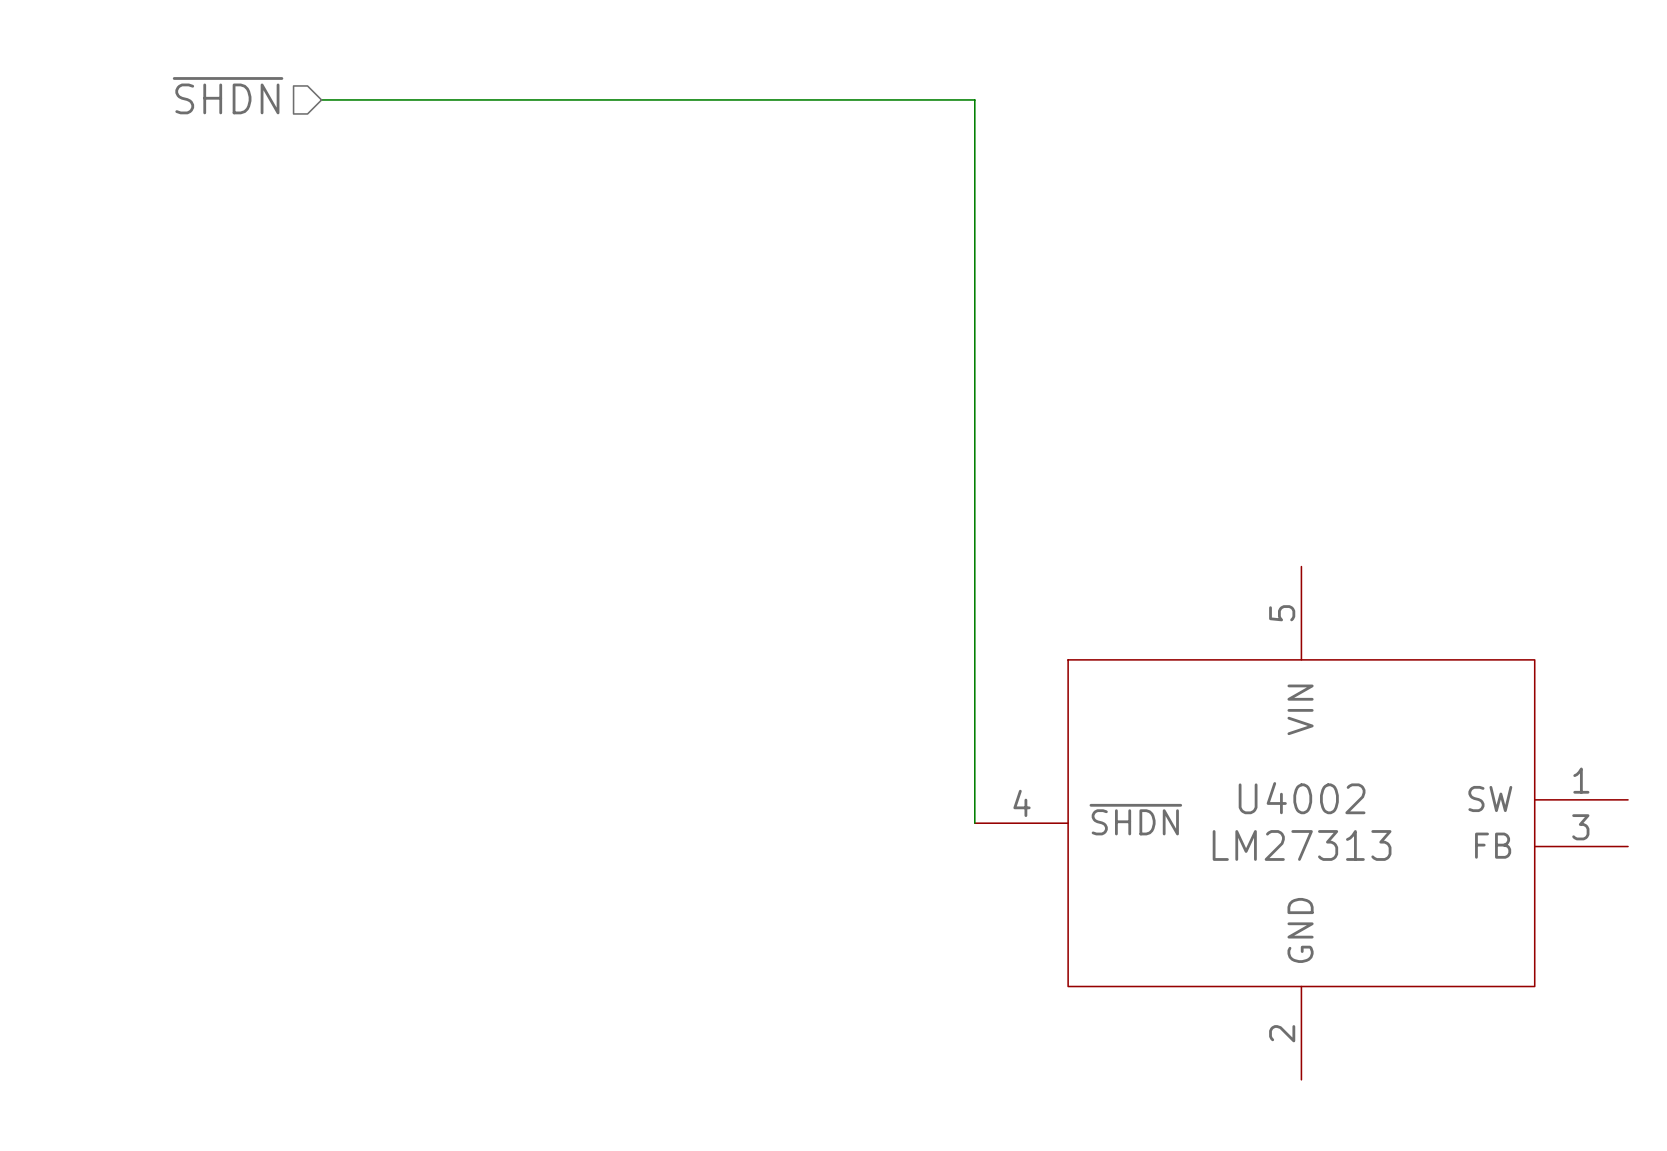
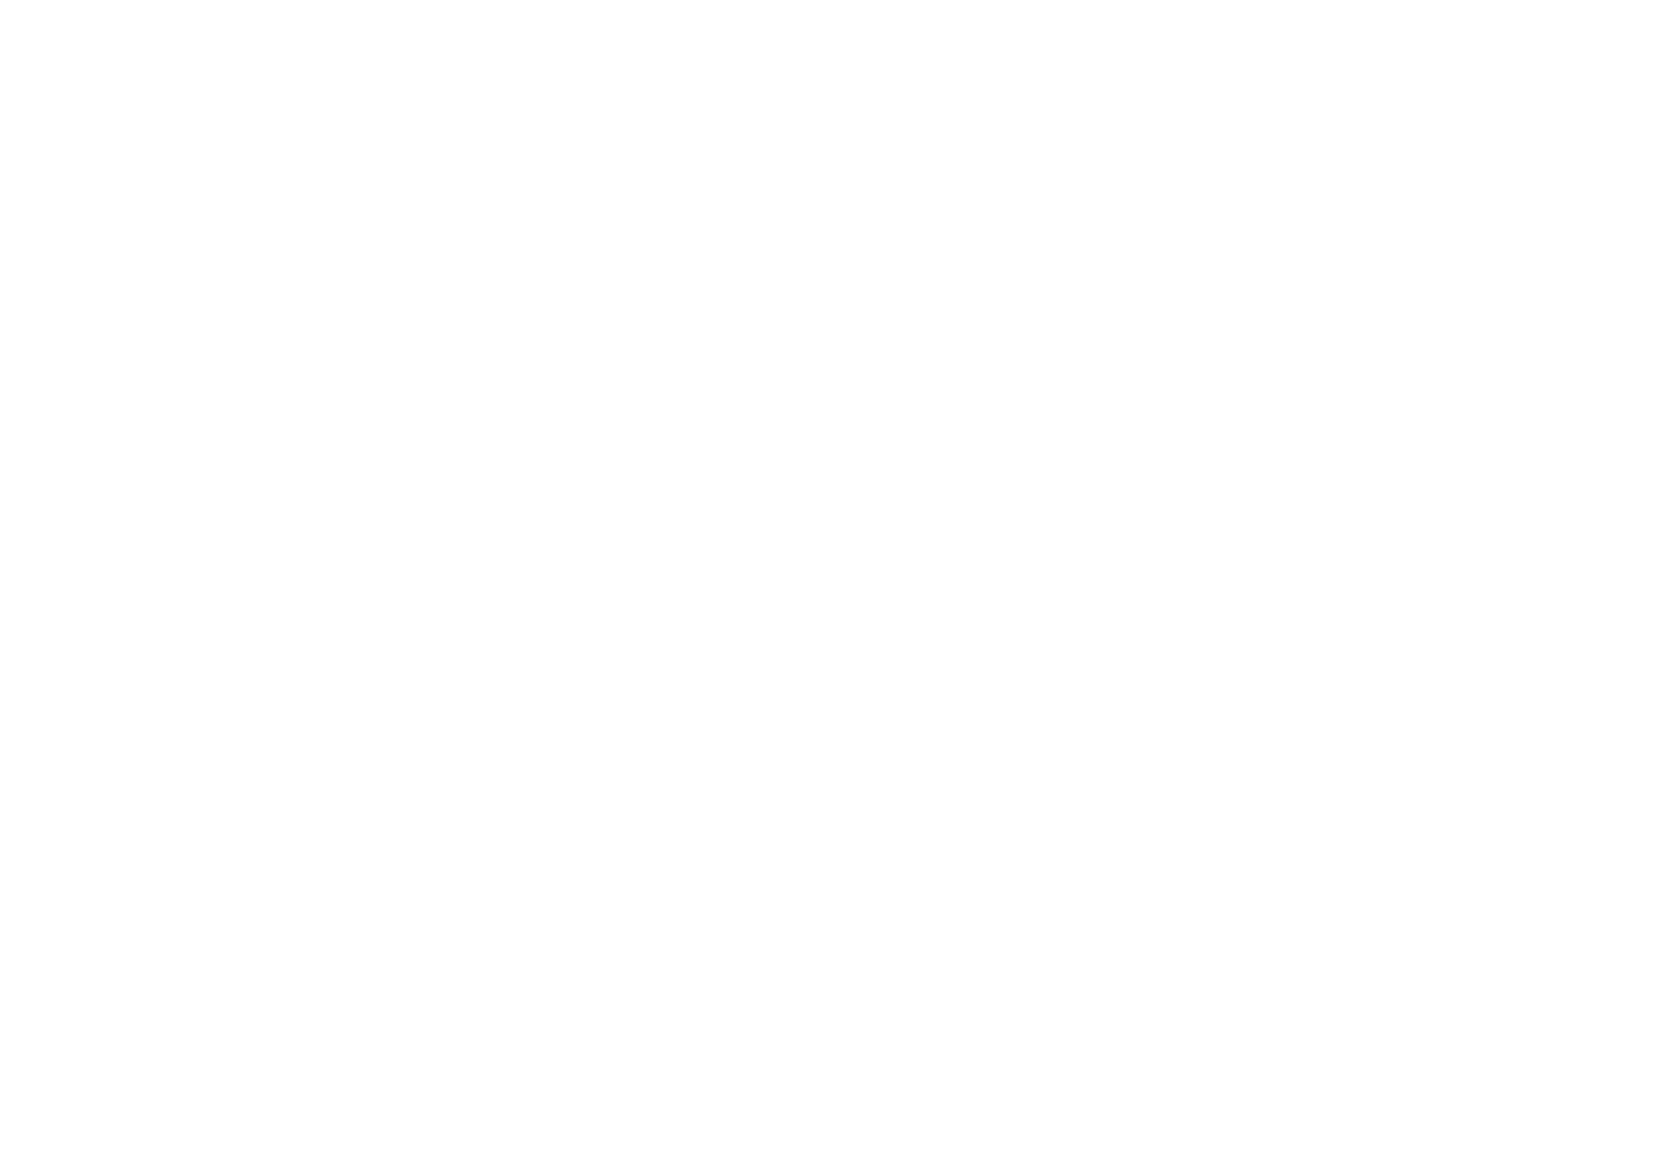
hierarchical label: ~{SHDN} (228, 95) -> none
wire: (321, 99) (974, 99) (974, 823) -> none
U4002: LM27313 (1301, 823) -> none

